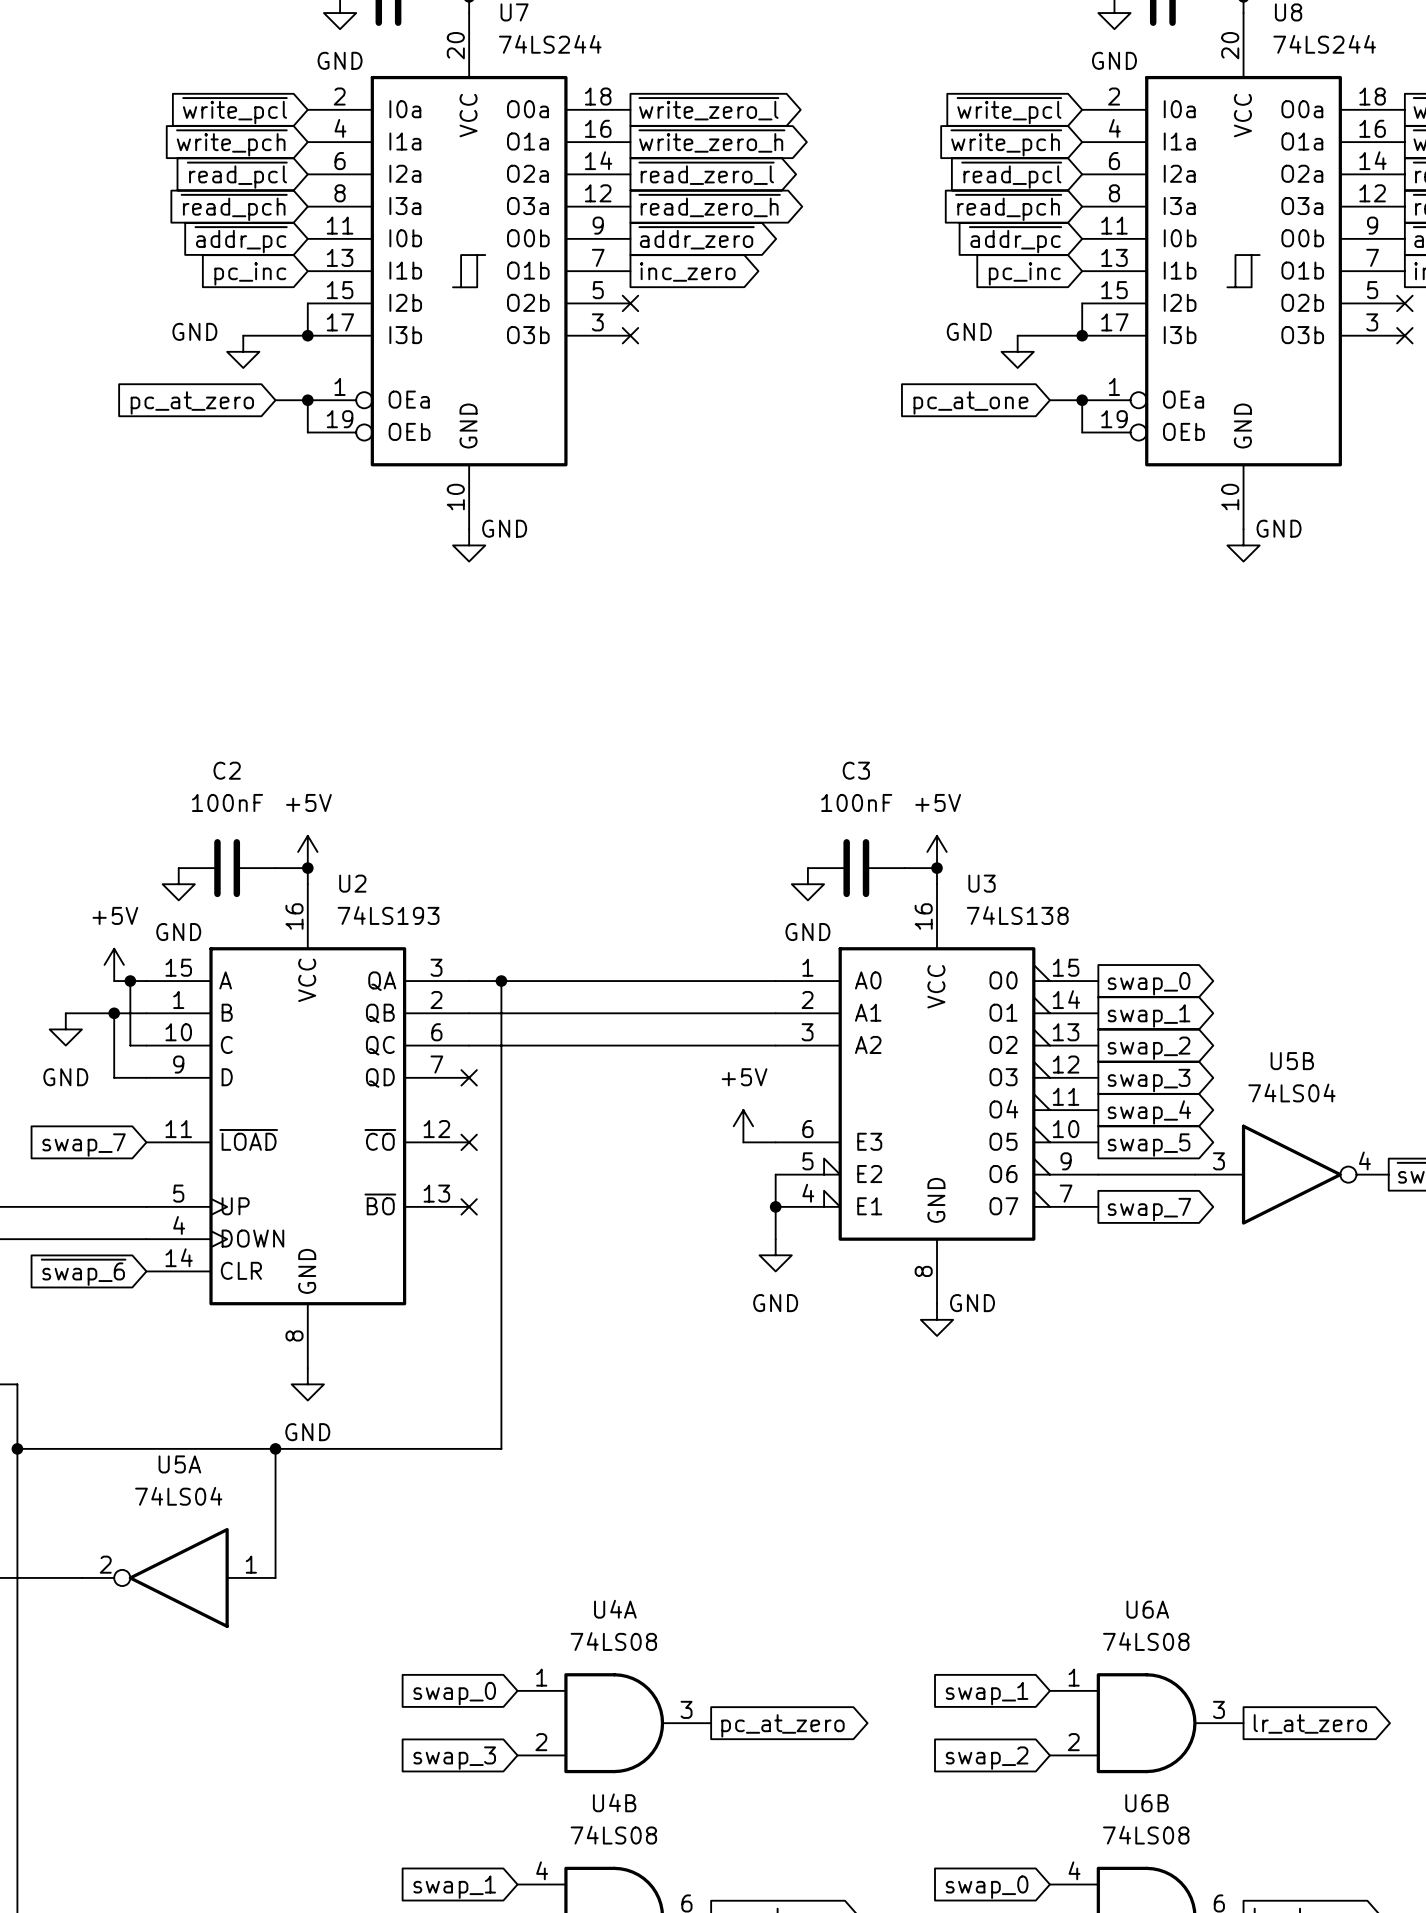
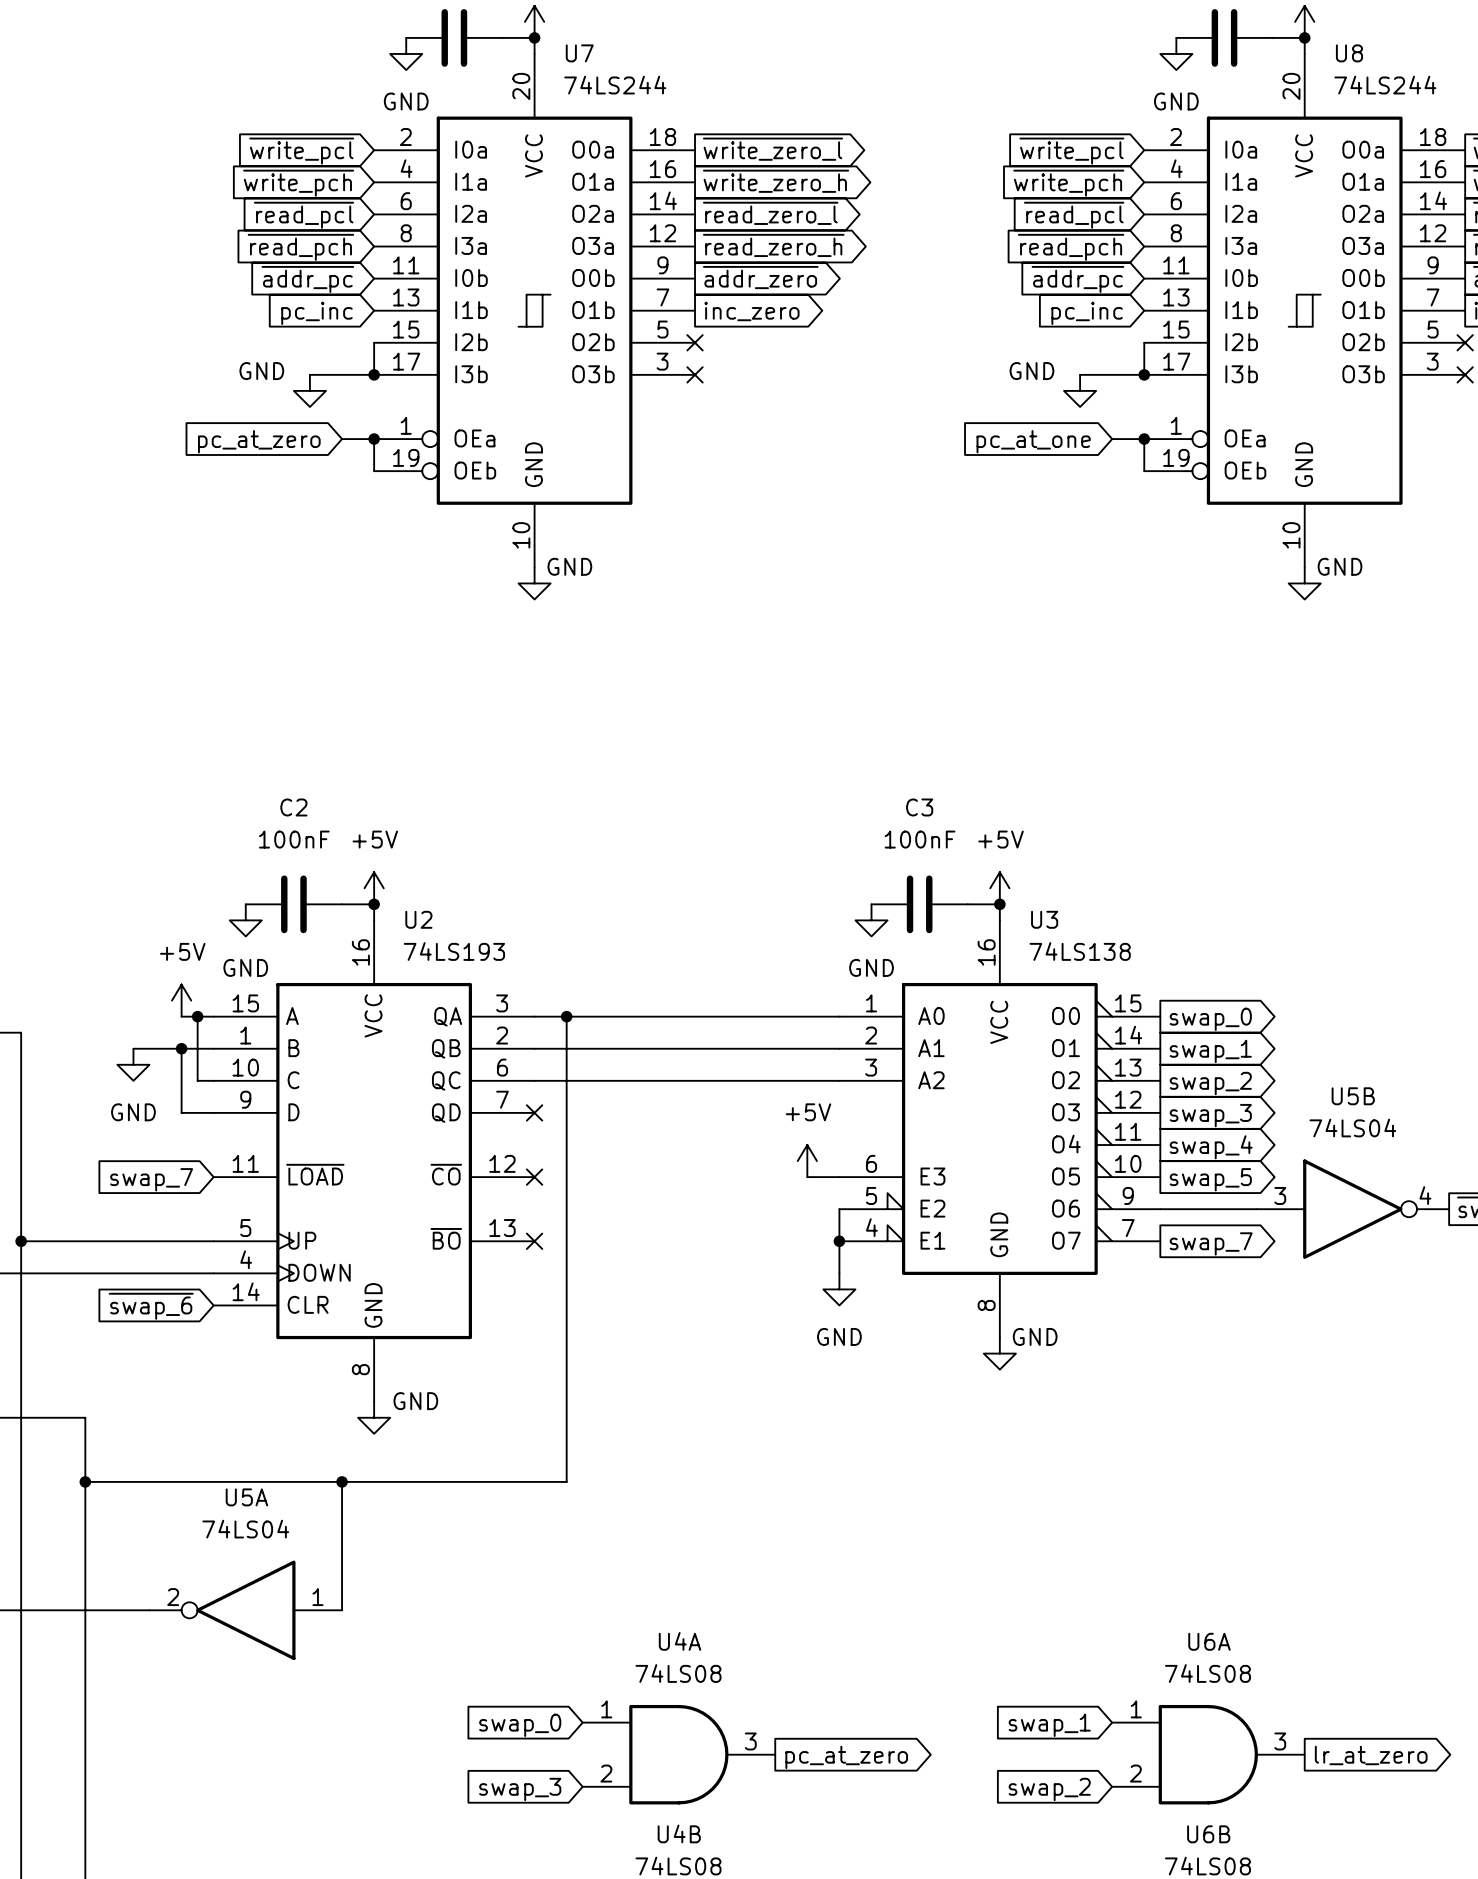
power symbol text position: GND (307, 1432) -> GND (415, 1401)

